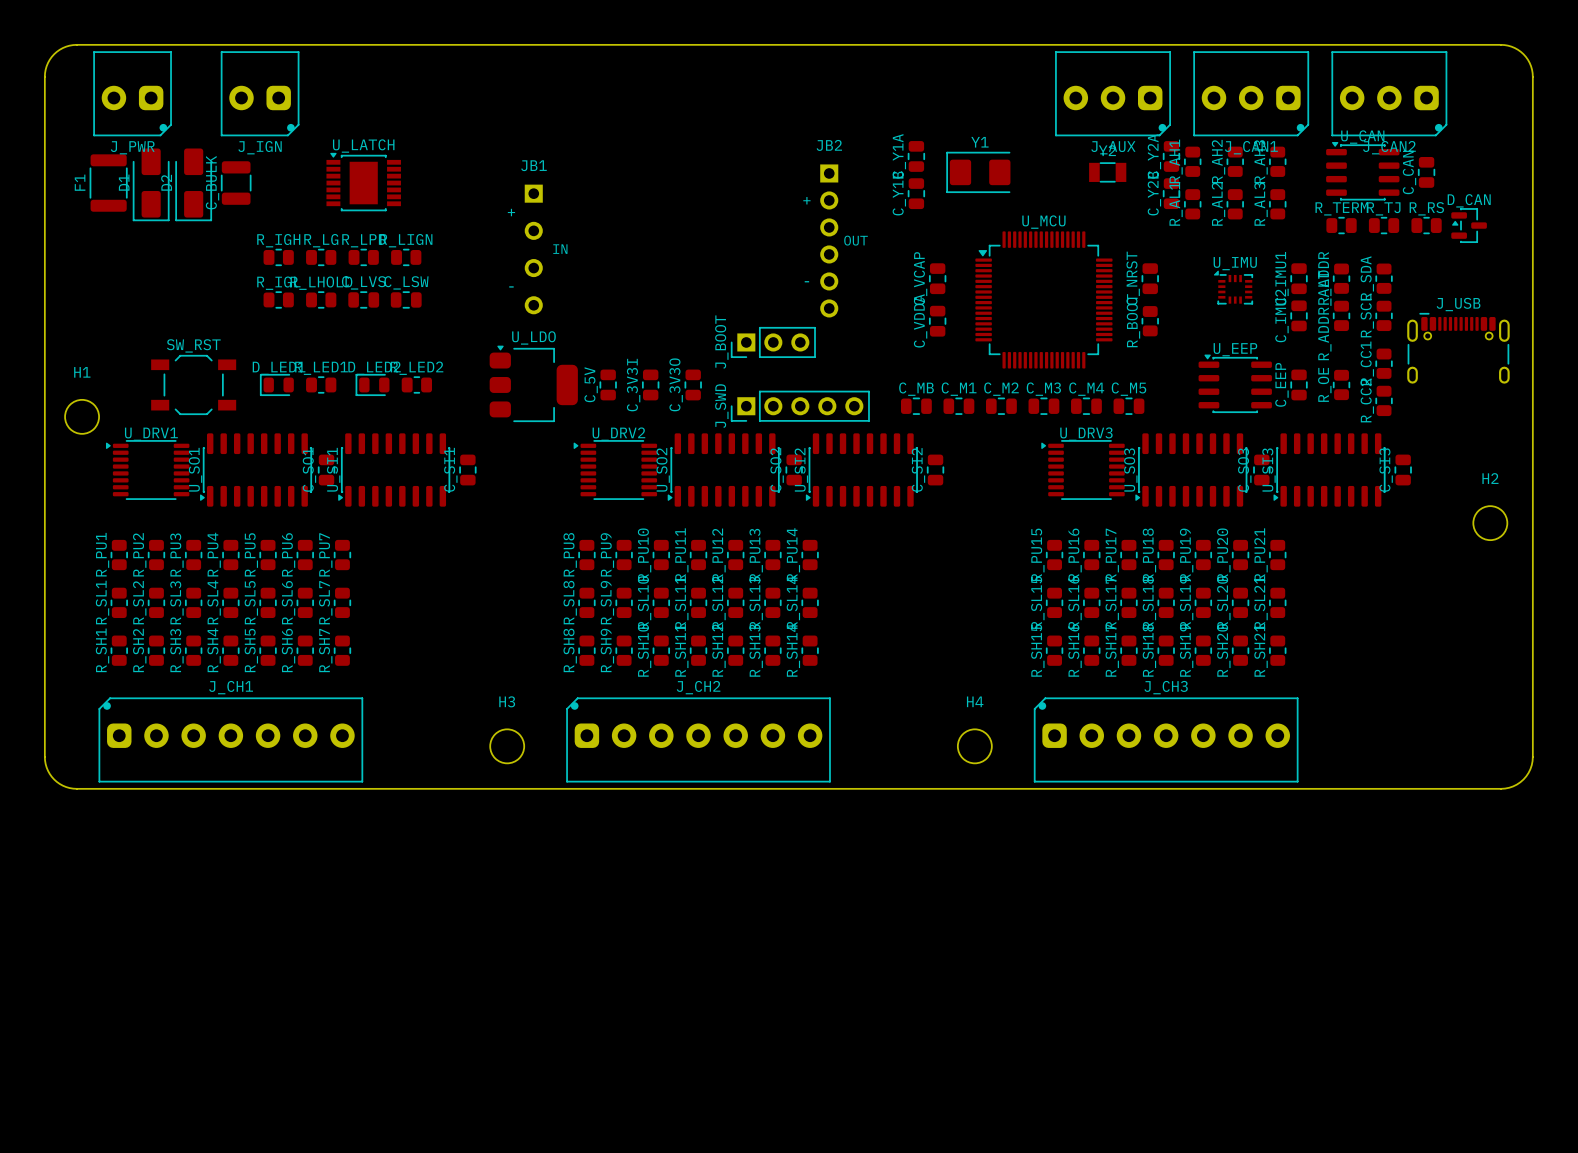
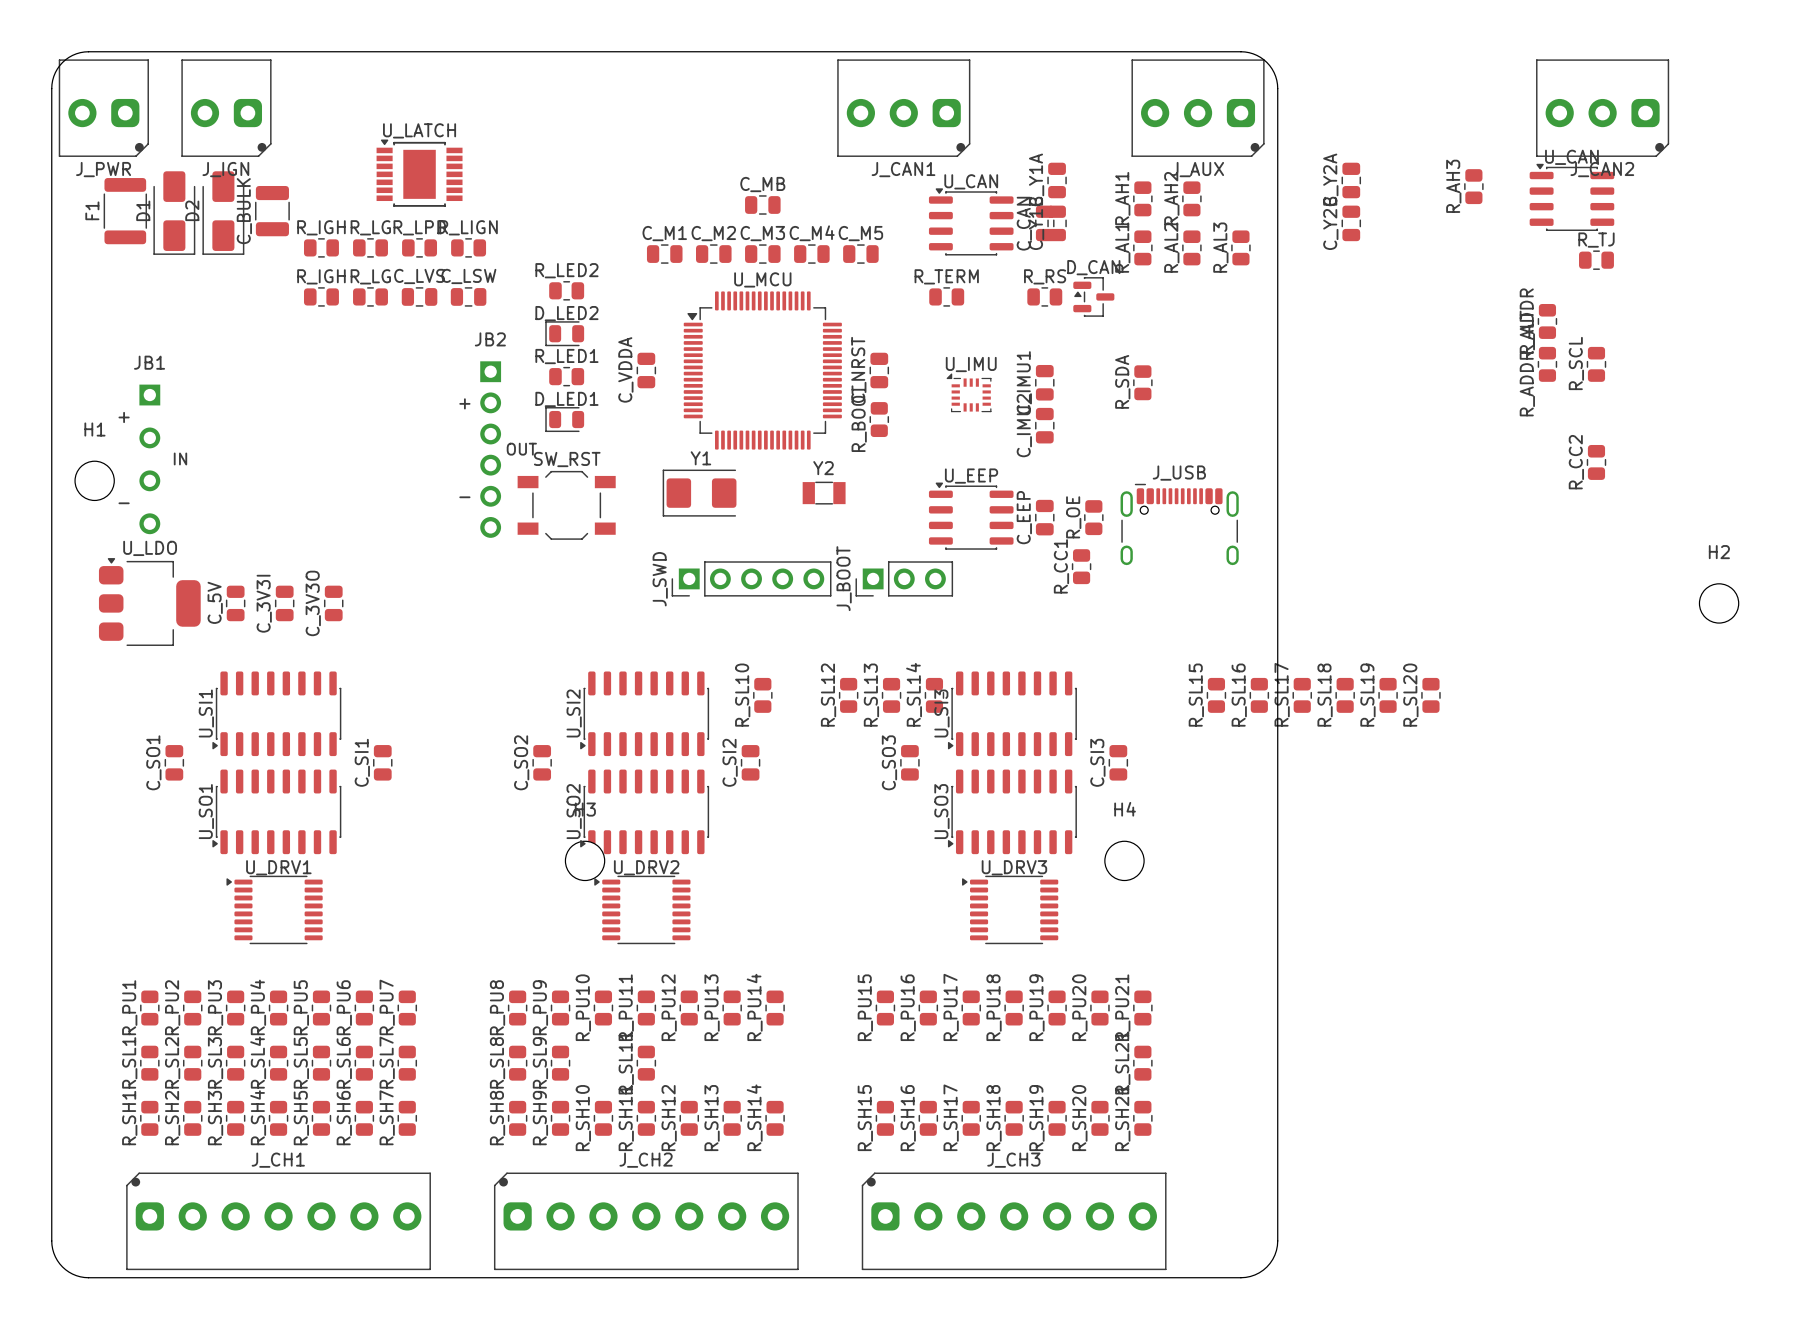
board edge: (1075, 44) (1500, 44) (1514, 48) (1527, 59) (1532, 76) (1532, 756) (1530, 769) (1520, 782) (1509, 787) (1500, 788) (76, 788) (62, 785) (54, 779) (48, 770) (44, 756) -> (1240, 51) (1253, 53) (1266, 62) (1274, 72) (1277, 88) (1277, 1240) (1274, 1255) (1263, 1270) (1250, 1276) (1240, 1277) (88, 1277) (76, 1275) (59, 1263) (51, 1245) (51, 873)
J_PWR position: (132, 93) -> (103, 108)
J_IGN position: (260, 93) -> (226, 108)
J_AUX position: (1113, 93) -> (1198, 108)
J_CAN1 position: (1251, 93) -> (903, 108)
R_AH1 position: (1192, 161) -> (1142, 198)
R_AH2 position: (1235, 161) -> (1191, 198)
Y1 position: (978, 172) -> (699, 493)
Y2 position: (1107, 172) -> (824, 493)
C_CAN: (1426, 172) -> none
C_MB: none -> (762, 205)
U_LATCH position: (363, 182) -> (419, 173)
U_CAN: none -> (971, 221)
C_CAN: none -> (1044, 223)
R_AL1 position: (1192, 204) -> (1142, 247)
R_AL2 position: (1235, 204) -> (1191, 247)
R_AL3 position: (1277, 204) -> (1240, 247)
R_IGH: none -> (321, 247)
R_LG: none -> (370, 247)
R_TERM: (1341, 225) -> none
R_RS: (1426, 225) -> none
D_CAN: (1469, 225) -> none
JB2 position: (829, 240) -> (490, 449)
JB1 position: (533, 249) -> (149, 459)
R_LPD position: (363, 257) -> (419, 247)
R_LIGN position: (406, 257) -> (468, 247)
R_TERM: none -> (946, 296)
R_RS: none -> (1044, 296)
D_CAN: none -> (1093, 296)
C_VCAP: (937, 278) -> none
C_NRST: (1150, 278) -> none
C_IMU1 position: (1299, 278) -> (1044, 382)
R_SDA: (1384, 278) -> none
U_IMU: (1233, 287) -> none
R_IGL: (278, 299) -> none
R_LHOLD: (321, 299) -> none
C_LVS position: (363, 299) -> (419, 296)
C_LSW position: (406, 299) -> (468, 296)
U_MCU: (1043, 299) -> none
C_IMU2 position: (1299, 315) -> (1044, 425)
C_VDDA: none -> (646, 370)
U_MCU: none -> (762, 370)
C_NRST: none -> (879, 370)
C_VDDA: (937, 321) -> none
R_BOOT: (1150, 321) -> none
R_SDA: none -> (1142, 382)
U_IMU: none -> (969, 392)
J_BOOT position: (773, 342) -> (904, 578)
J_USB: (1458, 348) -> none
R_BOOT: none -> (879, 419)
R_CC1 position: (1384, 363) -> (1081, 566)
U_LDO: (533, 383) -> none
U_EEP: (1235, 383) -> none
SW_RST: (193, 384) -> none
D_LED1 position: (276, 384) -> (564, 419)
R_LED1 position: (321, 384) -> (566, 376)
D_LED2 position: (372, 384) -> (564, 333)
R_LED2 position: (416, 384) -> (566, 290)
C_5V position: (608, 384) -> (235, 603)
C_3V3I position: (650, 384) -> (284, 603)
C_3V3O position: (693, 384) -> (333, 603)
C_EEP: (1299, 384) -> none
R_OE: (1341, 384) -> none
J_SWD position: (800, 406) -> (751, 578)
C_MB: (916, 406) -> none
C_M1 position: (958, 406) -> (664, 254)
C_M2 position: (1001, 406) -> (713, 254)
C_M3 position: (1043, 406) -> (762, 254)
C_M4 position: (1086, 406) -> (811, 254)
C_M5 position: (1128, 406) -> (860, 254)
SW_RST: none -> (566, 505)
U_EEP: none -> (971, 516)
C_EEP: none -> (1044, 517)
R_OE: none -> (1093, 517)
J_USB: none -> (1179, 524)
U_DRV1 position: (147, 470) -> (274, 909)
U_SO1 position: (255, 470) -> (276, 811)
C_SO1 position: (326, 470) -> (174, 762)
U_SI1 position: (394, 470) -> (276, 713)
C_SI1 position: (467, 470) -> (382, 762)
U_DRV2 position: (615, 470) -> (642, 909)
U_SO2 position: (723, 470) -> (644, 811)
C_SO2 position: (794, 470) -> (542, 762)
U_SI2 position: (861, 470) -> (644, 713)
C_SI2 position: (935, 470) -> (750, 762)
U_DRV3 position: (1083, 470) -> (1010, 909)
U_SO3 position: (1191, 470) -> (1012, 811)
C_SO3 position: (1261, 470) -> (909, 762)
U_SI3 position: (1329, 470) -> (1012, 713)
C_SI3 position: (1403, 470) -> (1118, 762)
U_LDO: none -> (149, 602)
R_PU1 position: (119, 555) -> (149, 1008)
R_PU2 position: (156, 555) -> (192, 1008)
R_PU3 position: (193, 555) -> (235, 1008)
R_PU4 position: (230, 555) -> (278, 1008)
R_PU5 position: (268, 555) -> (321, 1008)
R_PU6 position: (305, 555) -> (364, 1008)
R_PU7 position: (342, 555) -> (407, 1008)
R_PU8 position: (586, 555) -> (517, 1008)
R_PU9 position: (624, 555) -> (560, 1008)
R_PU10 position: (661, 555) -> (603, 1008)
R_PU11 position: (698, 555) -> (646, 1008)
R_PU12 position: (735, 555) -> (689, 1008)
R_PU13 position: (772, 555) -> (732, 1008)
R_PU14 position: (810, 555) -> (775, 1008)
R_PU15 position: (1054, 555) -> (885, 1008)
R_PU16 position: (1091, 555) -> (928, 1008)
R_PU17 position: (1128, 555) -> (971, 1008)
R_PU18 position: (1166, 555) -> (1014, 1008)
R_PU19 position: (1203, 555) -> (1057, 1008)
R_PU20 position: (1240, 555) -> (1099, 1008)
R_PU21 position: (1277, 555) -> (1142, 1008)
R_SL1 position: (119, 602) -> (149, 1063)
R_SL2 position: (156, 602) -> (192, 1063)
R_SL3 position: (193, 602) -> (235, 1063)
R_SL4 position: (230, 602) -> (278, 1063)
R_SL5 position: (268, 602) -> (321, 1063)
R_SL6 position: (305, 602) -> (364, 1063)
R_SL7 position: (342, 602) -> (407, 1063)
R_SL8 position: (586, 602) -> (517, 1063)
R_SL9 position: (624, 602) -> (560, 1063)
R_SL11 position: (698, 602) -> (646, 1063)
R_SL21 position: (1277, 602) -> (1142, 1063)
R_SH1 position: (119, 650) -> (149, 1118)
R_SH2 position: (156, 650) -> (192, 1118)
R_SH3 position: (193, 650) -> (235, 1118)
R_SH4 position: (230, 650) -> (278, 1118)
R_SH5 position: (268, 650) -> (321, 1118)
R_SH6 position: (305, 650) -> (364, 1118)
R_SH7 position: (342, 650) -> (407, 1118)
R_SH8 position: (586, 650) -> (517, 1118)
R_SH9 position: (624, 650) -> (560, 1118)
R_SH10 position: (661, 650) -> (603, 1118)
R_SH11 position: (698, 650) -> (646, 1118)
R_SH12 position: (735, 650) -> (689, 1118)
R_SH13 position: (772, 650) -> (732, 1118)
R_SH14 position: (810, 650) -> (775, 1118)
R_SH15 position: (1054, 650) -> (885, 1118)
R_SH16 position: (1091, 650) -> (928, 1118)
R_SH17 position: (1128, 650) -> (971, 1118)
R_SH18 position: (1166, 650) -> (1014, 1118)
R_SH19 position: (1203, 650) -> (1057, 1118)
R_SH20 position: (1240, 650) -> (1099, 1118)
R_SH21 position: (1277, 650) -> (1142, 1118)
J_CH1 position: (230, 739) -> (278, 1221)
J_CH2 position: (698, 739) -> (646, 1221)
J_CH3 position: (1166, 739) -> (1014, 1221)

